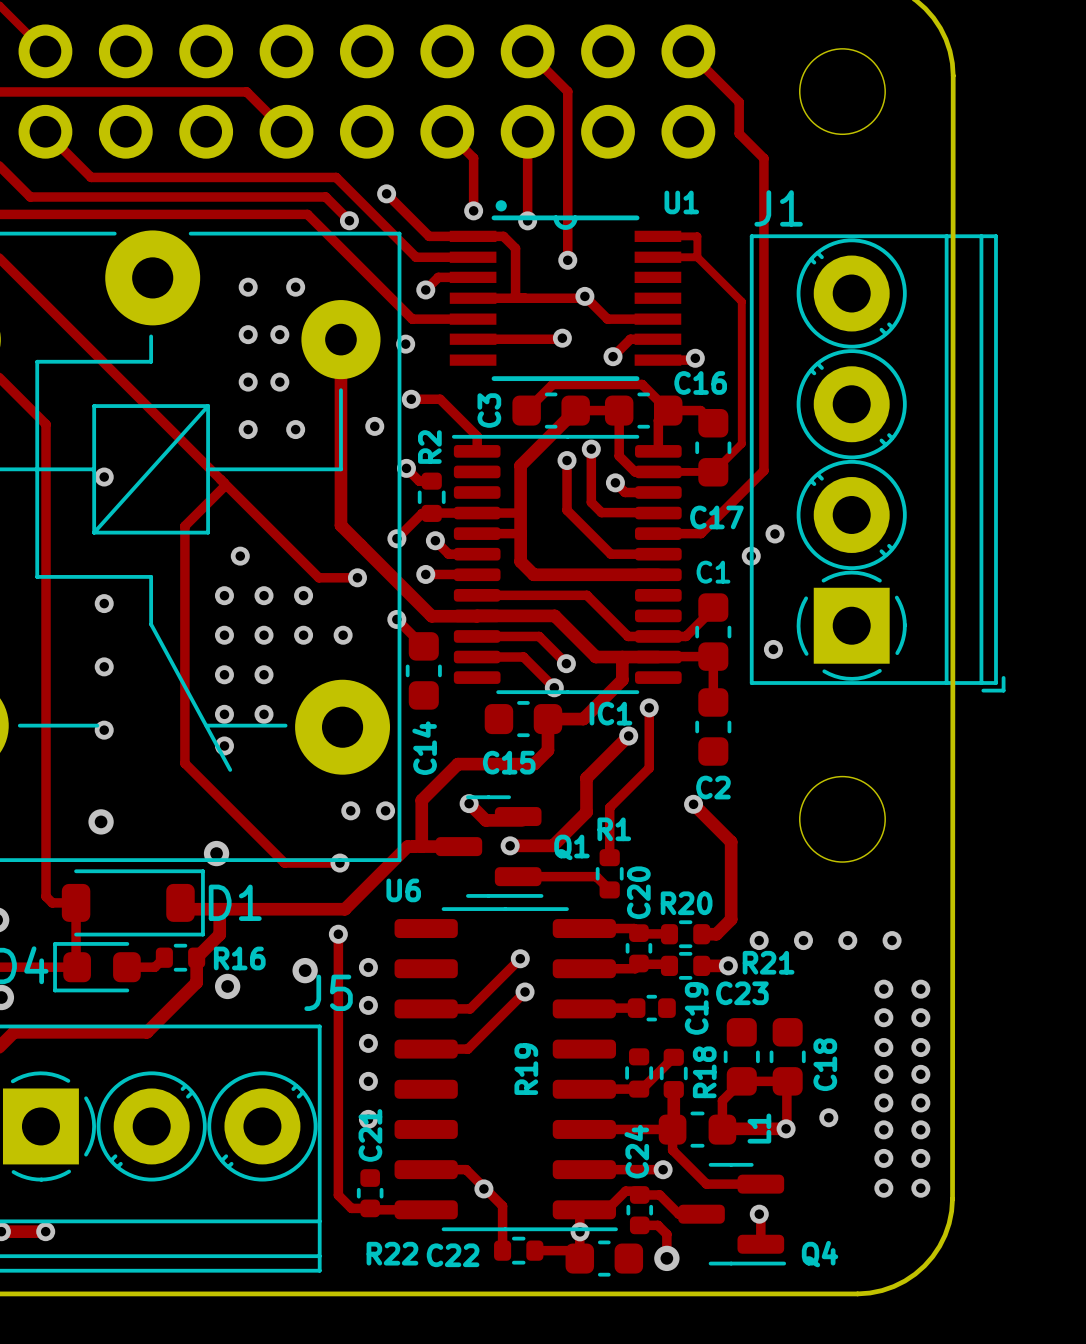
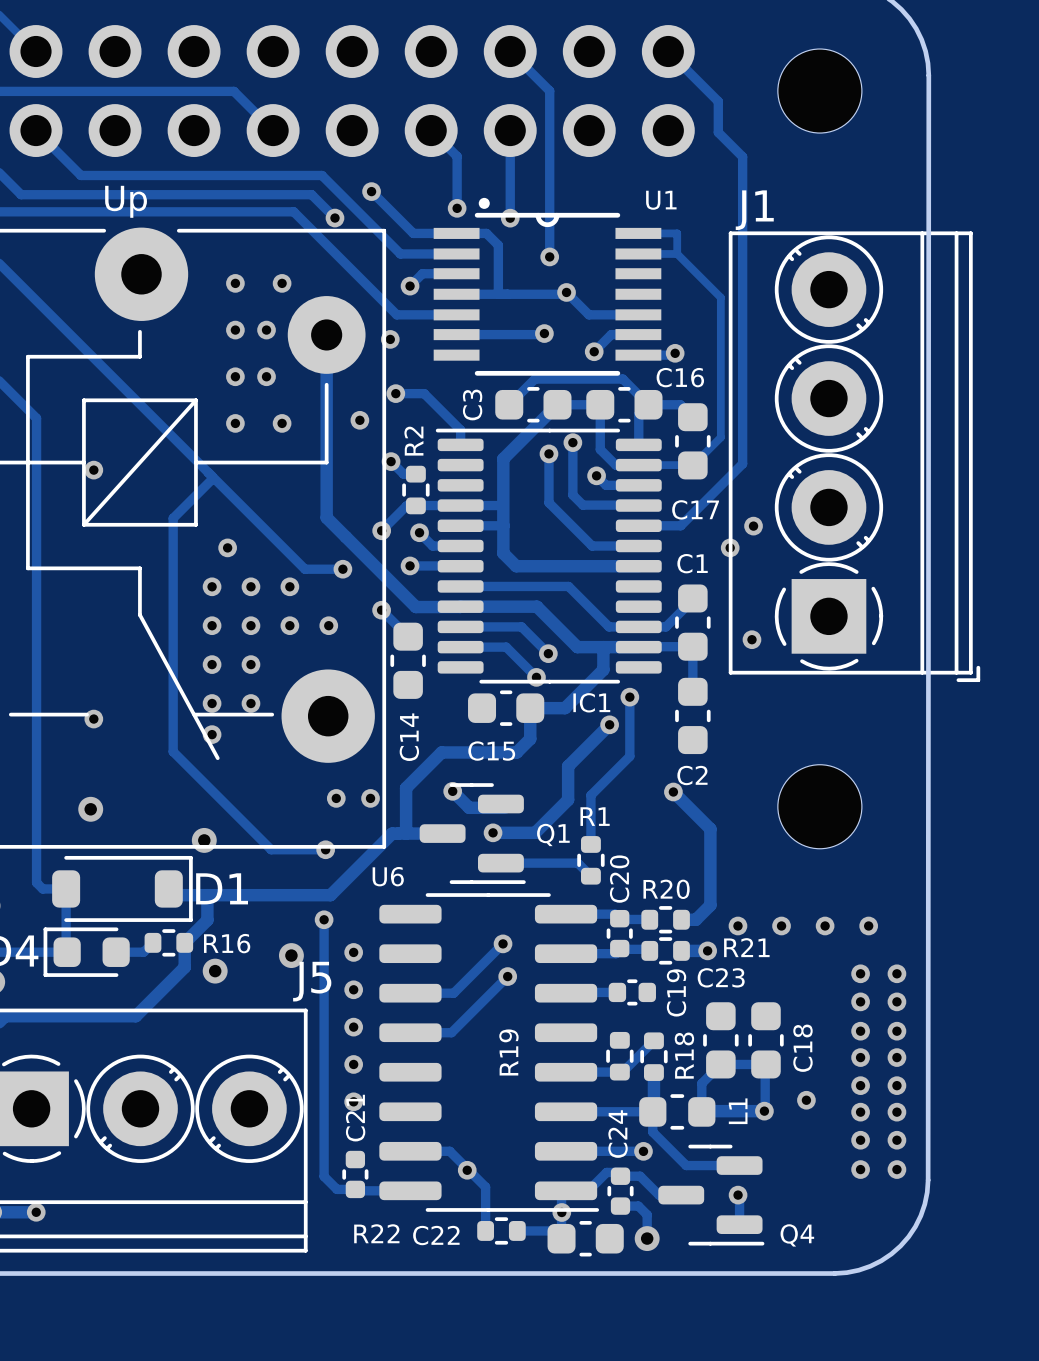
text: none -> Up (126, 201)
via: (104, 603) -> none
via: (104, 666) -> none

